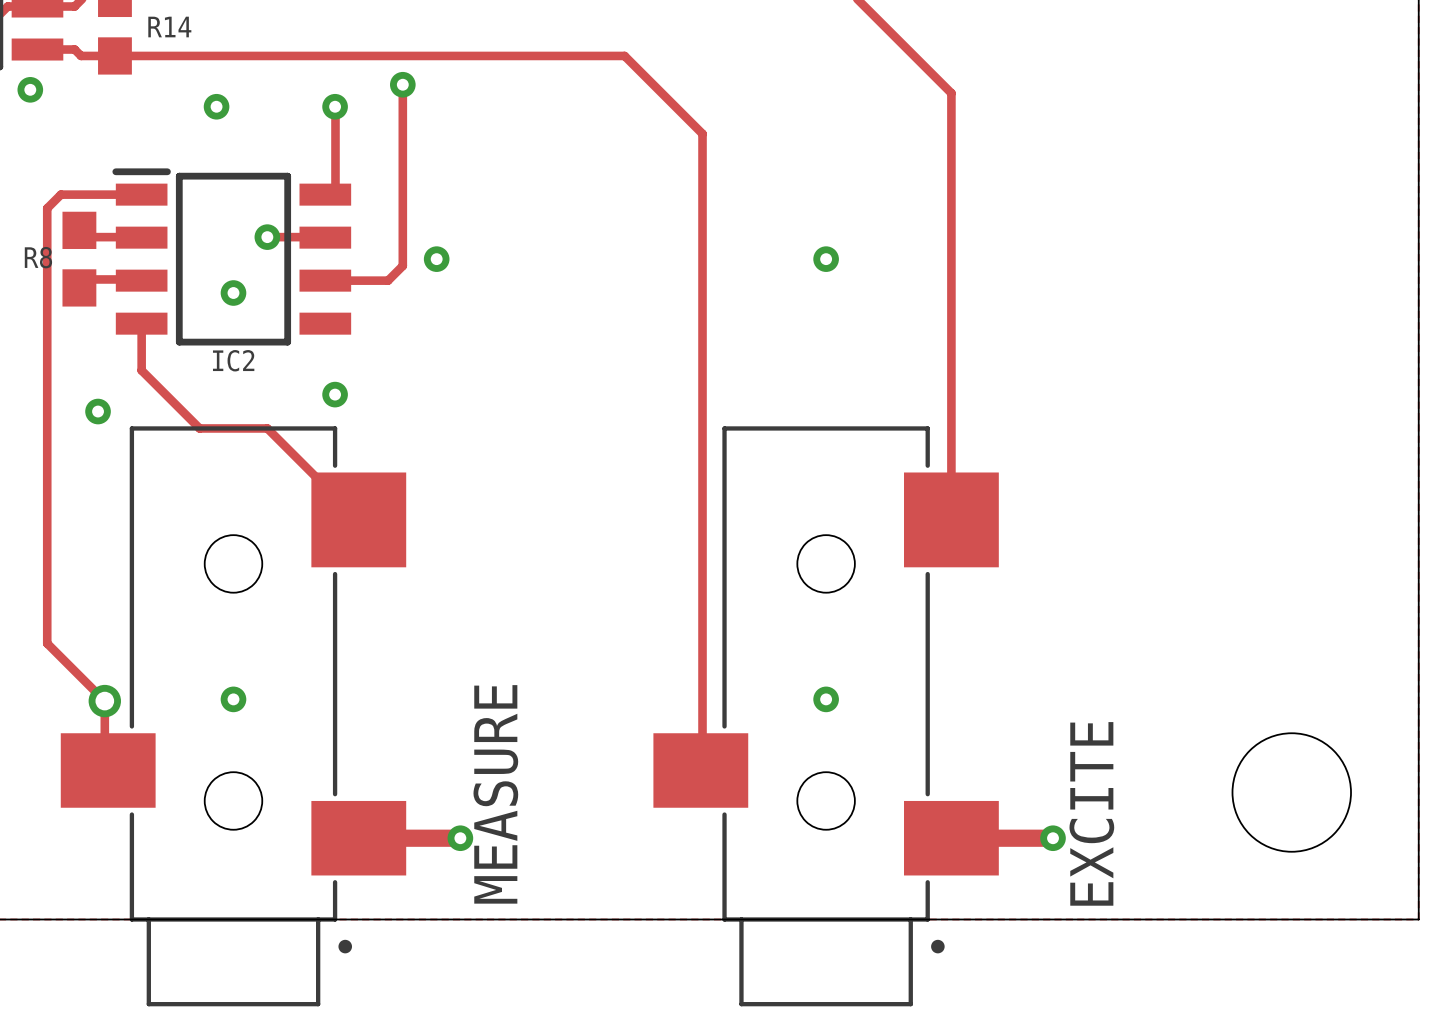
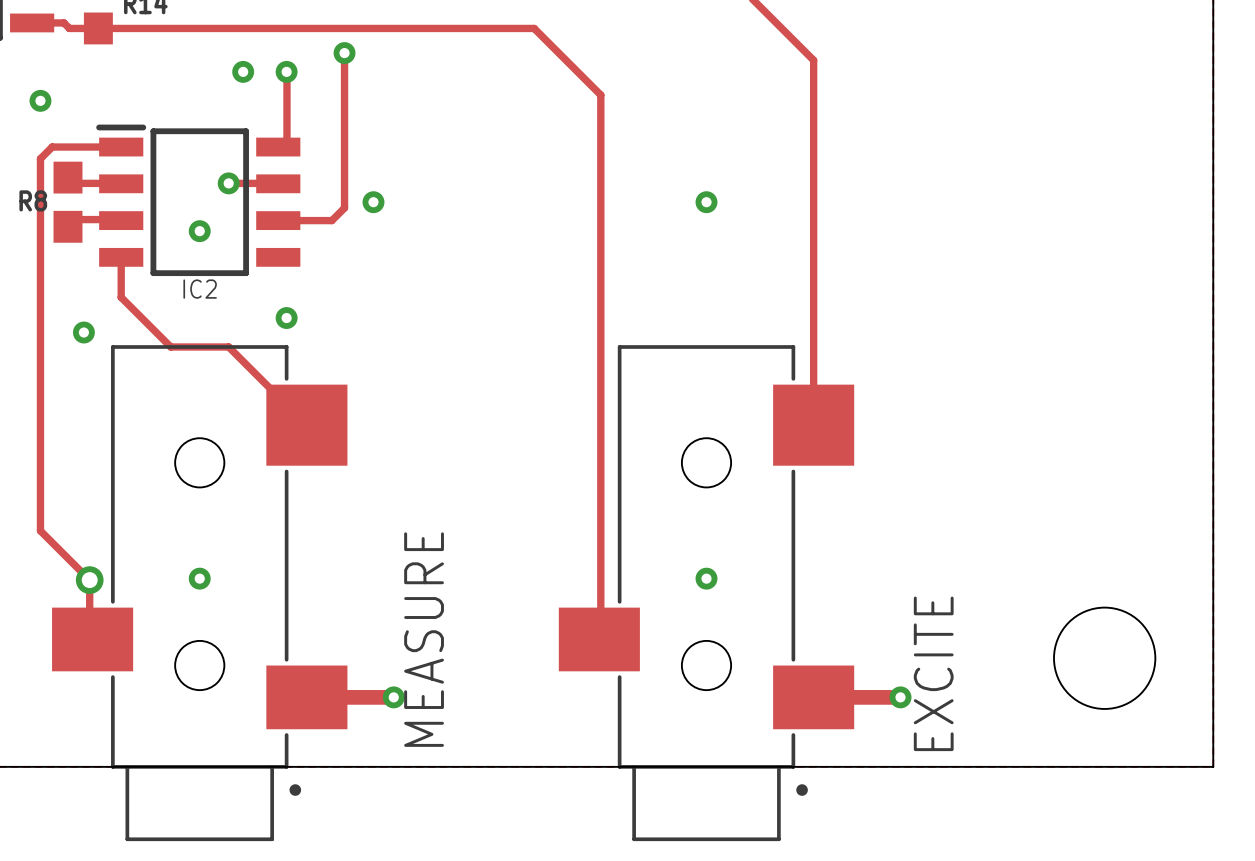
via position: (30, 89) -> (40, 100)
via position: (216, 106) -> (243, 71)

